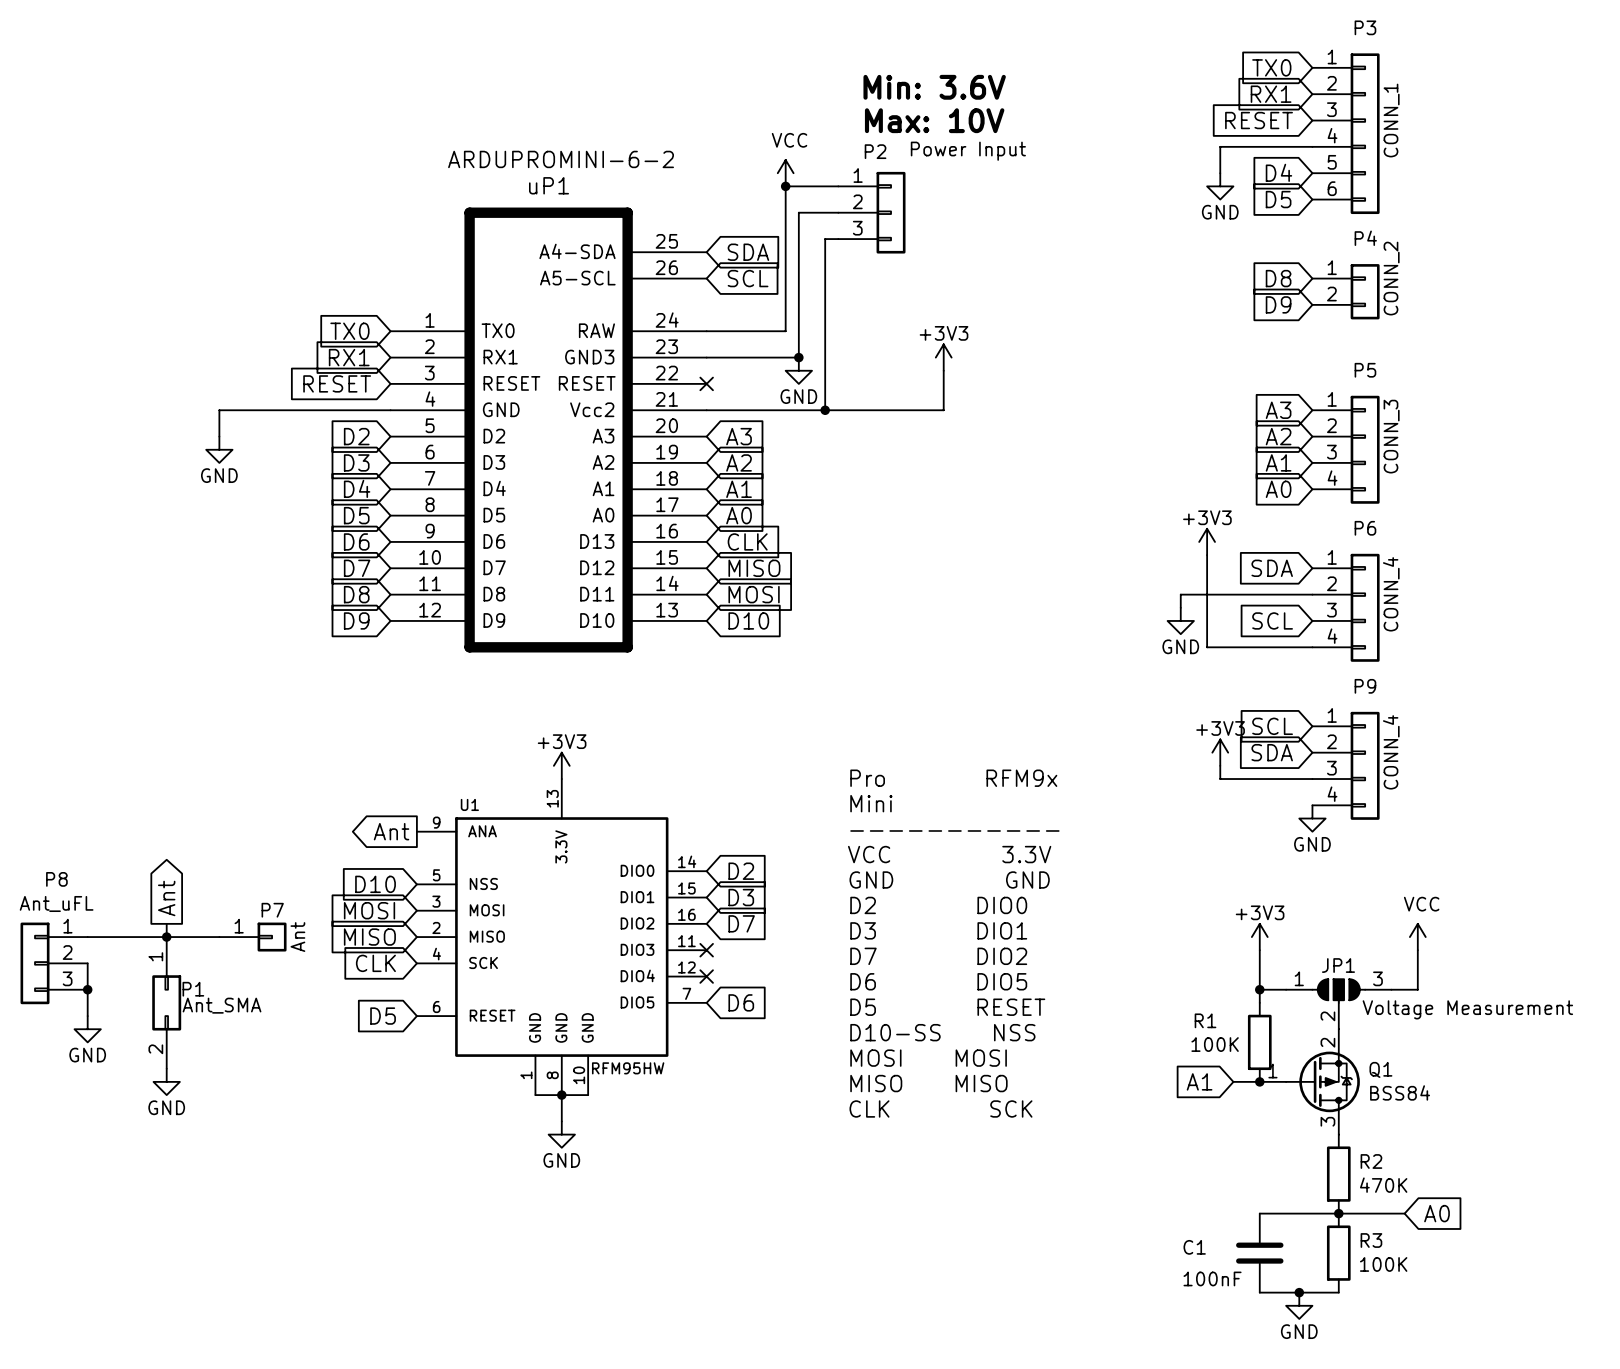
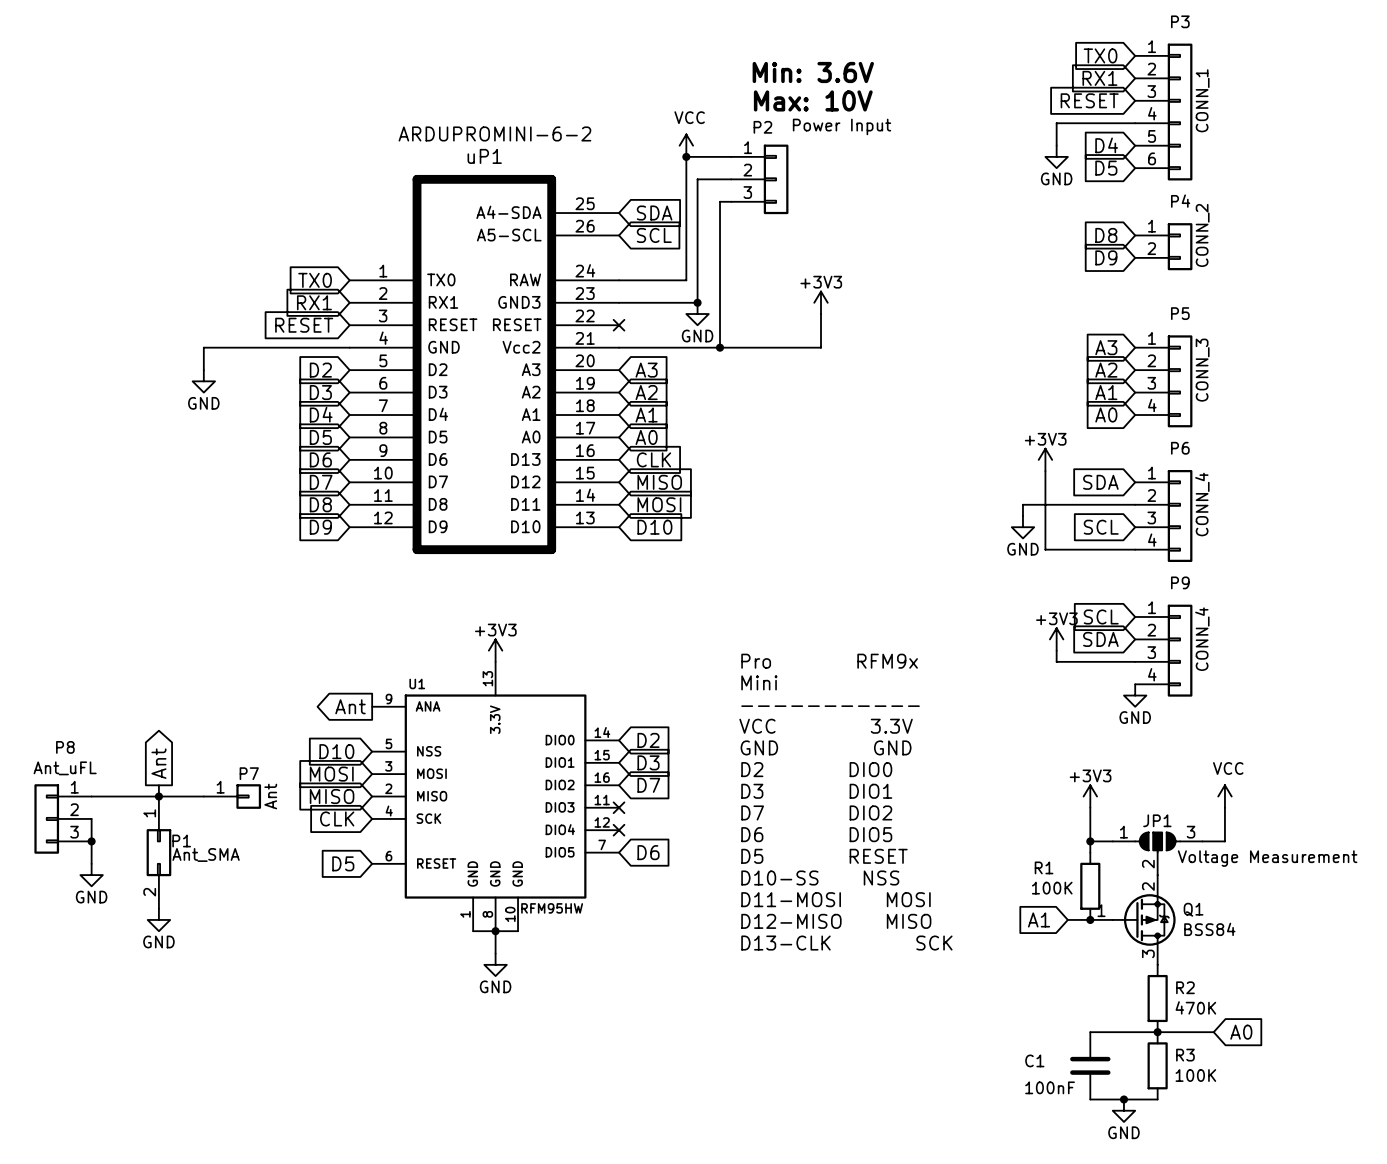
text: MOSI MOSI (928, 1058) -> D11-MOSI MOSI (835, 899)
text: MISO MISO (928, 1083) -> D12-MISO MISO (836, 921)
text: CLK SCK (940, 1108) -> D13-CLK SCK (846, 943)

